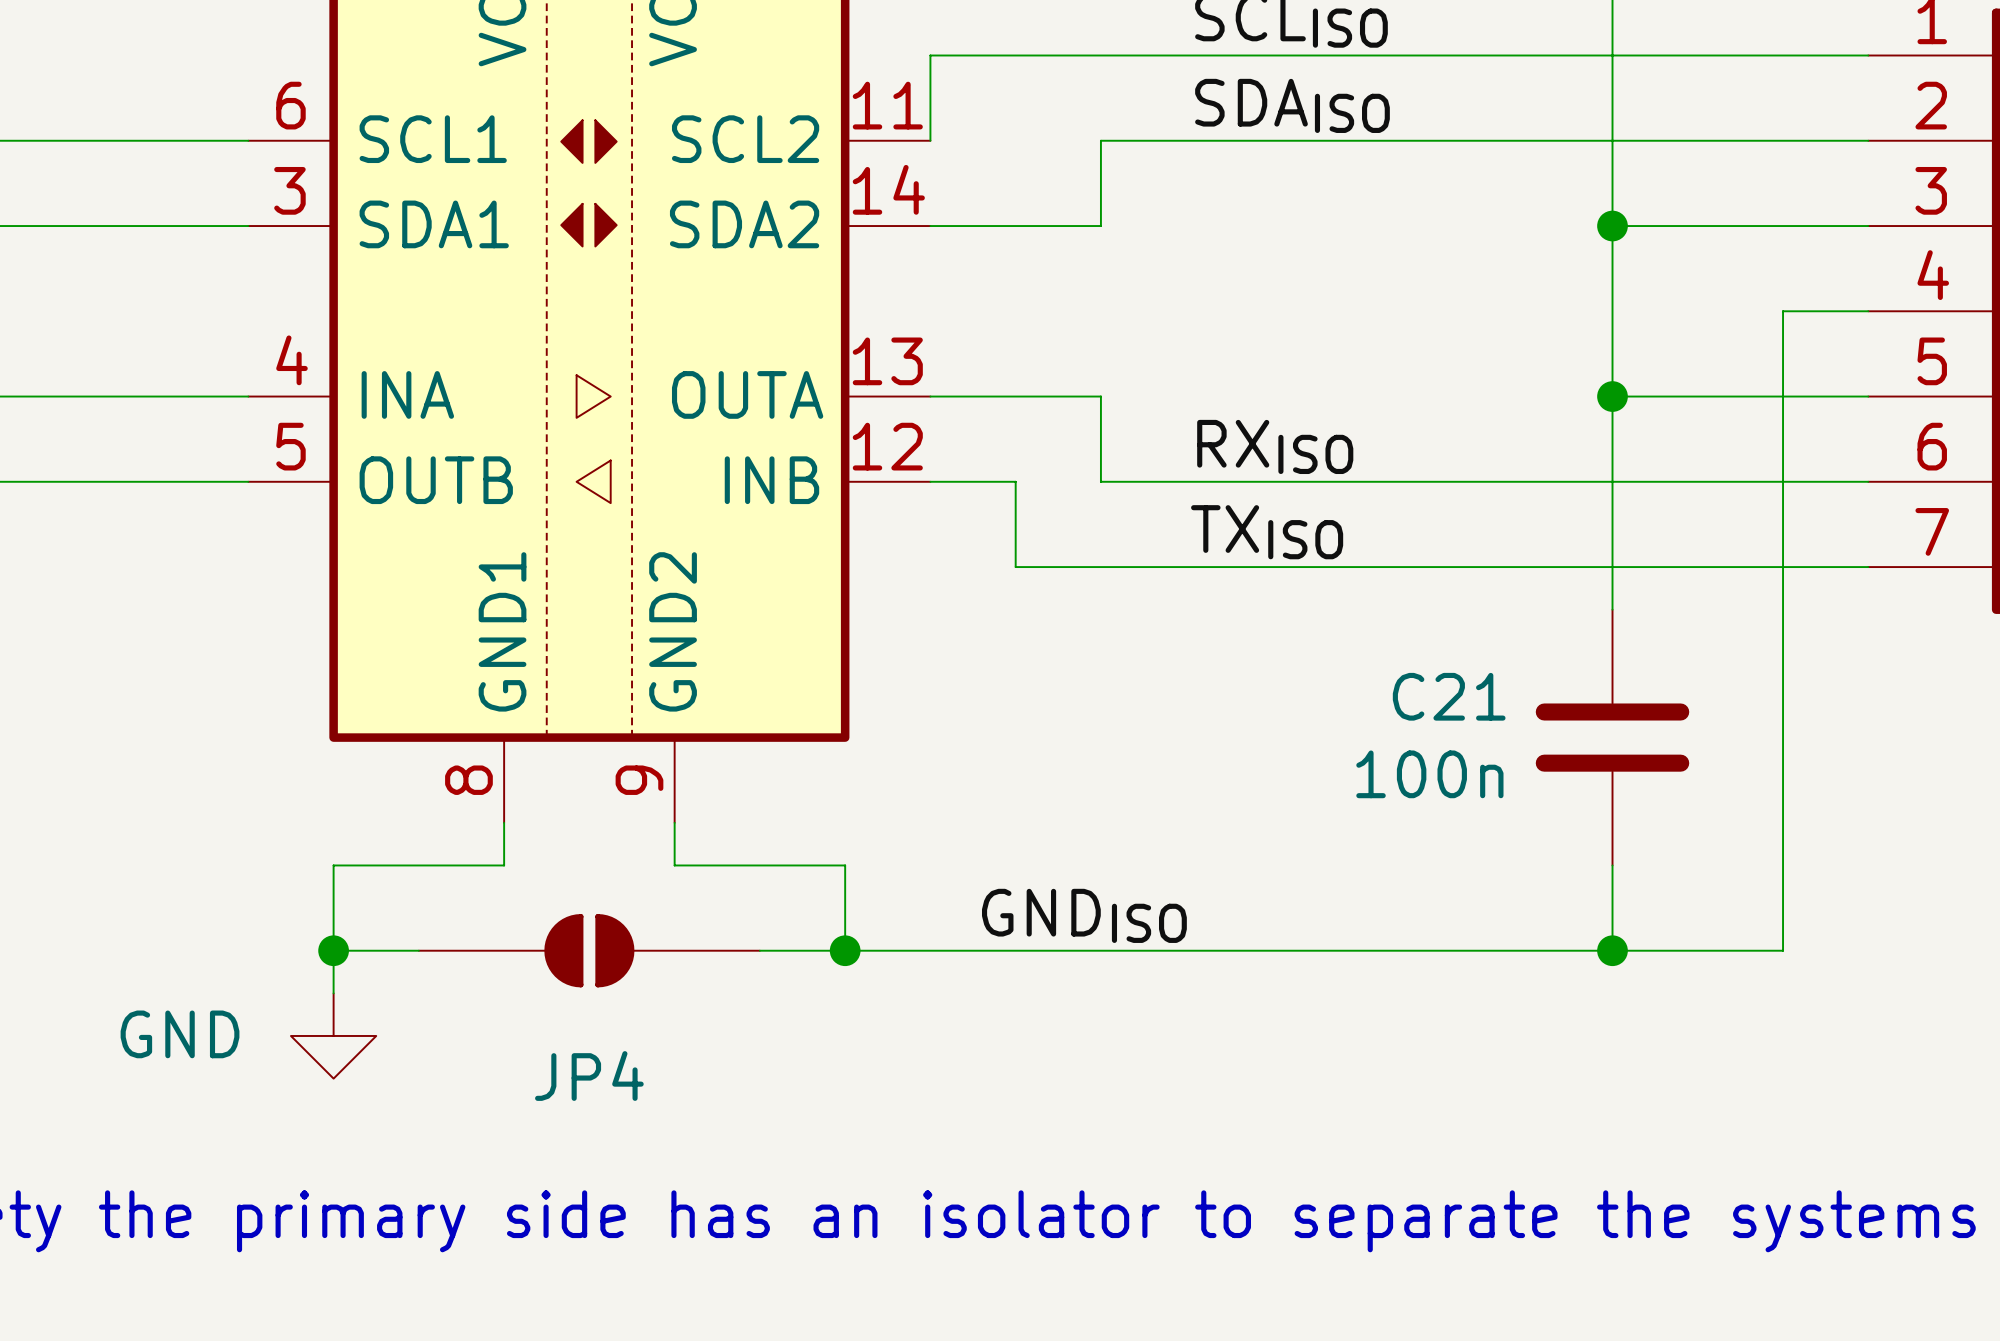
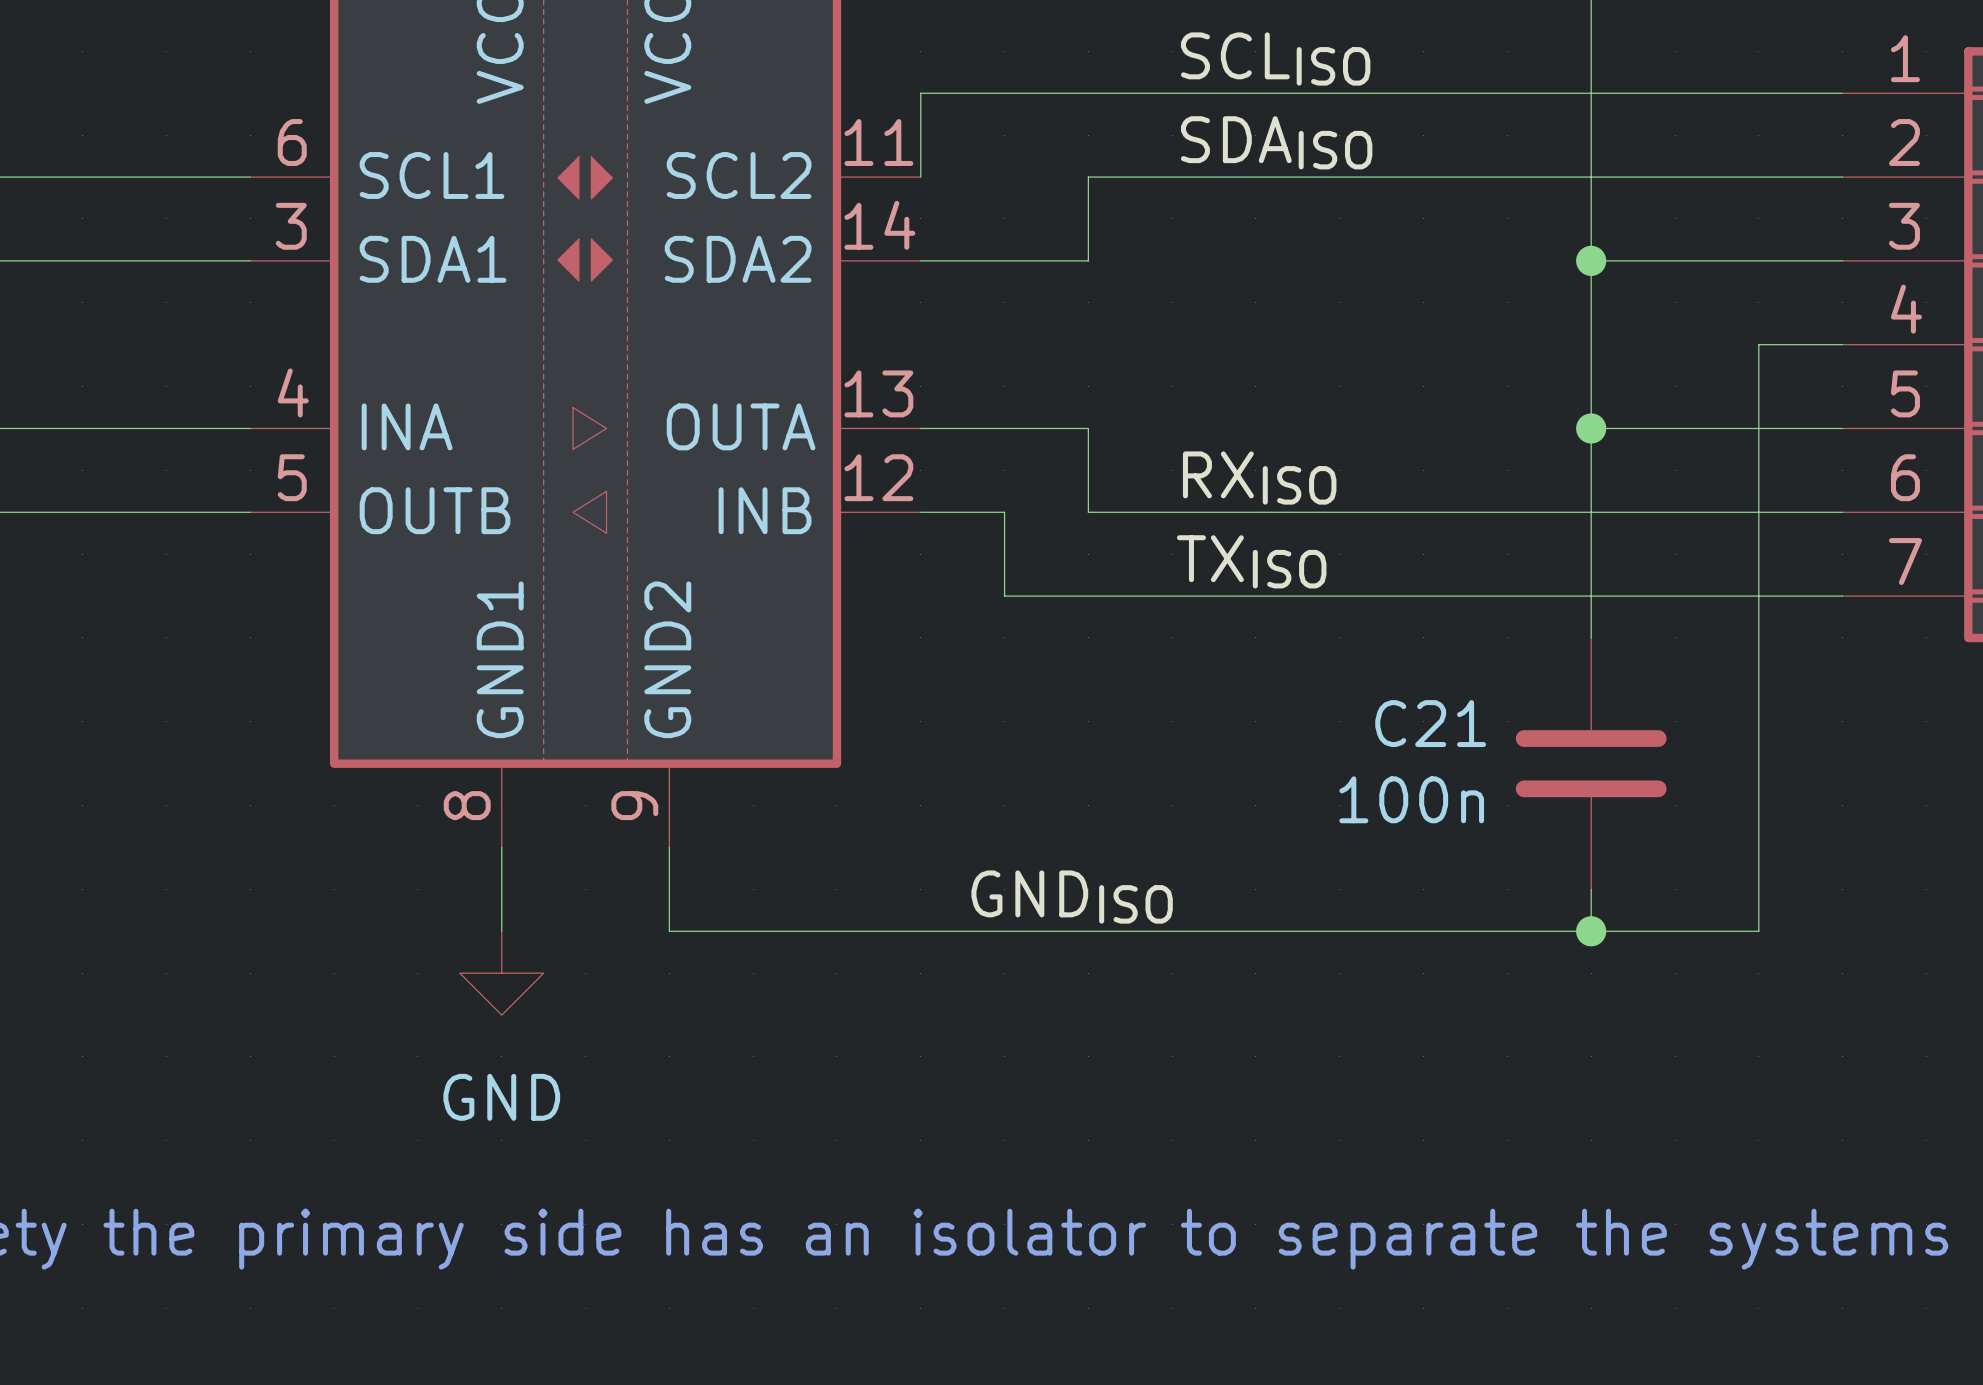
wire: (504, 865) (333, 865) (333, 993) -> (501, 889) (501, 931)
wire: (674, 865) (845, 865) (845, 950) -> none
wire: (1612, 908) (1612, 950) -> none
wire: (1783, 908) (1783, 950) (759, 950) -> (1758, 931) (669, 931) (669, 889)
label position: GNDISO (1084, 915) -> GNDISO (1072, 897)
wire: (333, 950) (418, 950) -> none
junction: (333, 950) -> none
JP4: (589, 950) -> none
junction: (845, 950) -> none
junction position: (1612, 950) -> (1591, 931)
power symbol text position: GND (180, 1034) -> GND (501, 1097)
power symbol position: GND (333, 1035) -> GND (501, 973)

